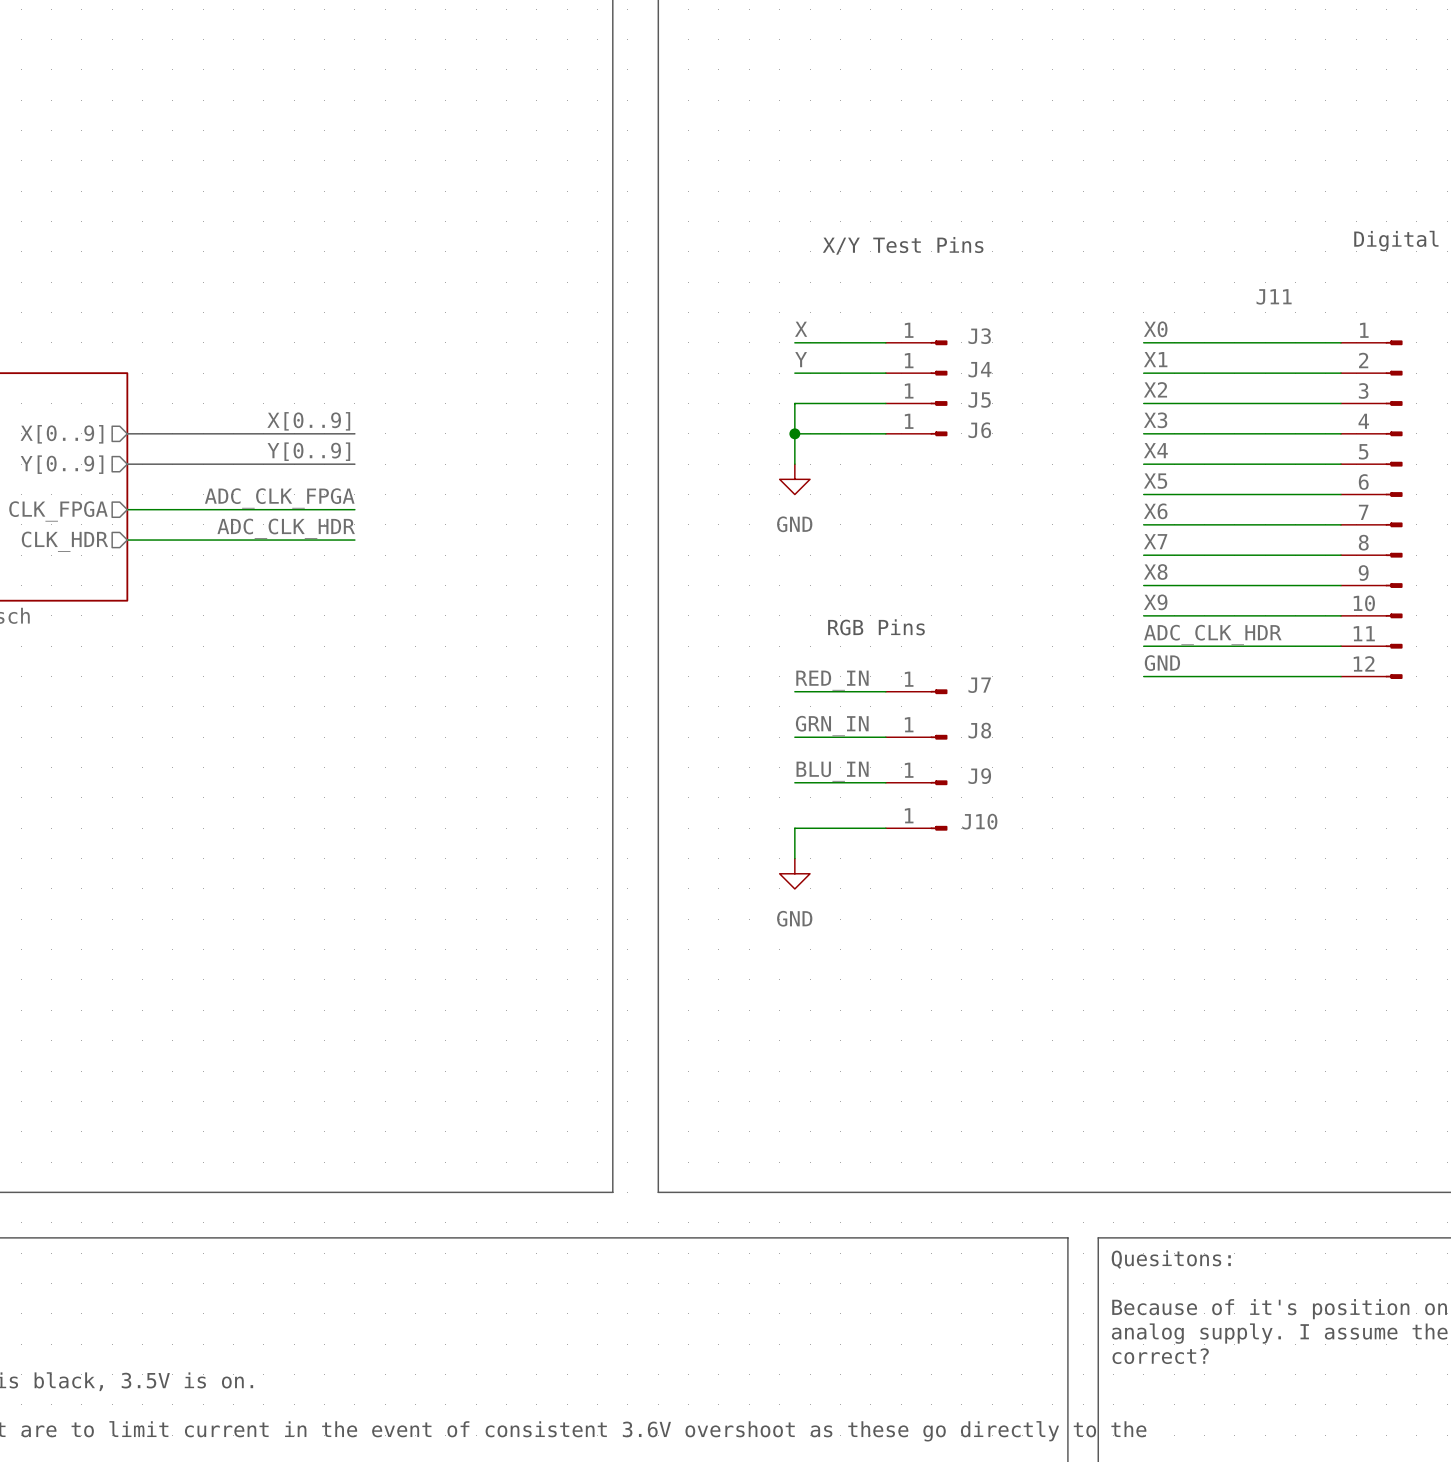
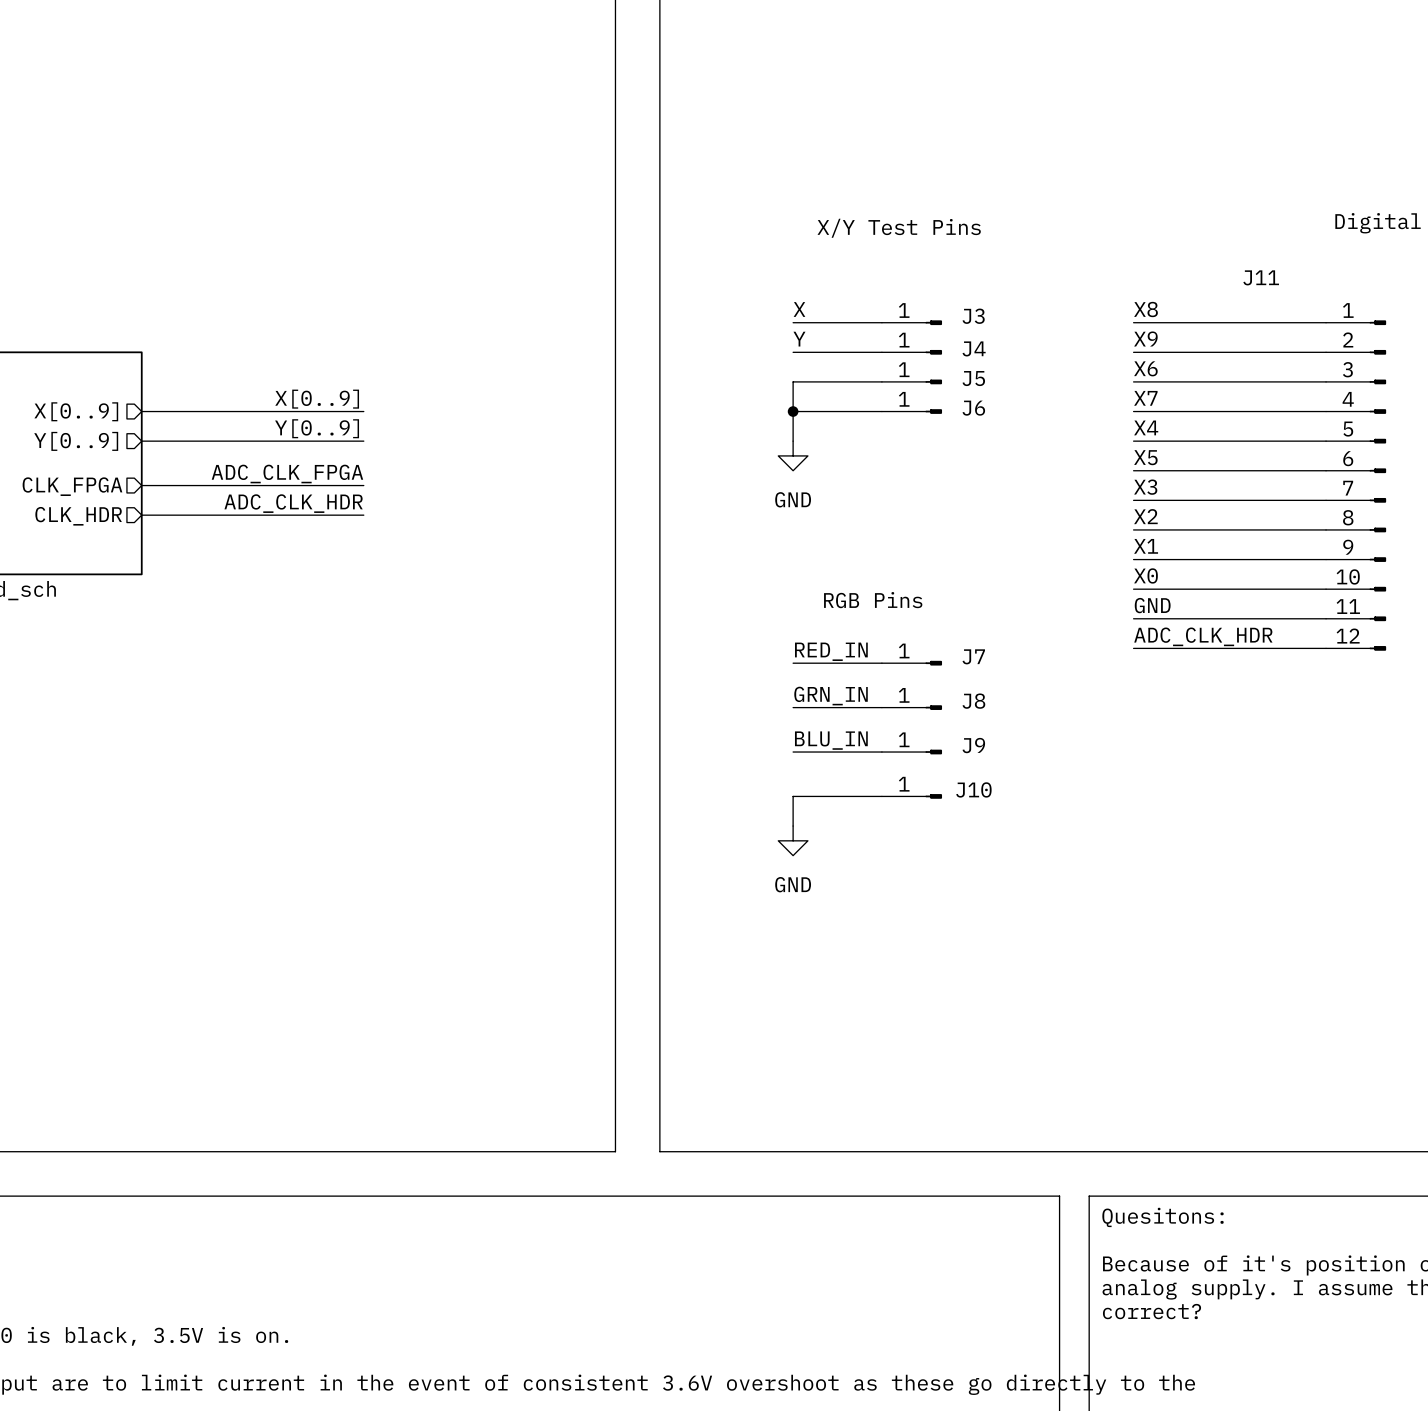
label: X0 (1155, 329) -> X8 (1146, 309)
label: X1 (1155, 359) -> X9 (1145, 338)
label: X2 (1155, 389) -> X6 (1145, 368)
label: X3 (1155, 420) -> X7 (1145, 398)
label: X6 (1155, 511) -> X3 (1145, 487)
label: X7 (1155, 541) -> X2 (1145, 516)
label: X8 (1155, 572) -> X1 (1146, 546)
label: X9 (1155, 602) -> X0 (1146, 575)
label: ADC_CLK_HDR (1212, 635) -> GND (1152, 605)
label: GND (1162, 663) -> ADC_CLK_HDR (1203, 636)

